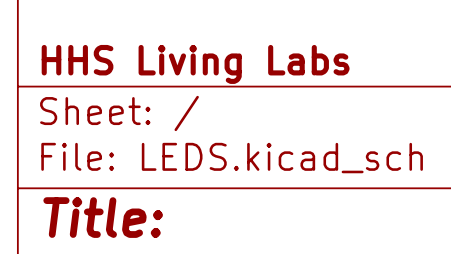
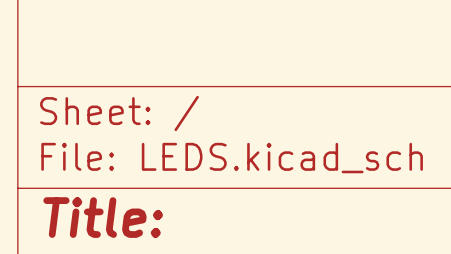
title block: HHS Living Labs (195, 64) -> none

